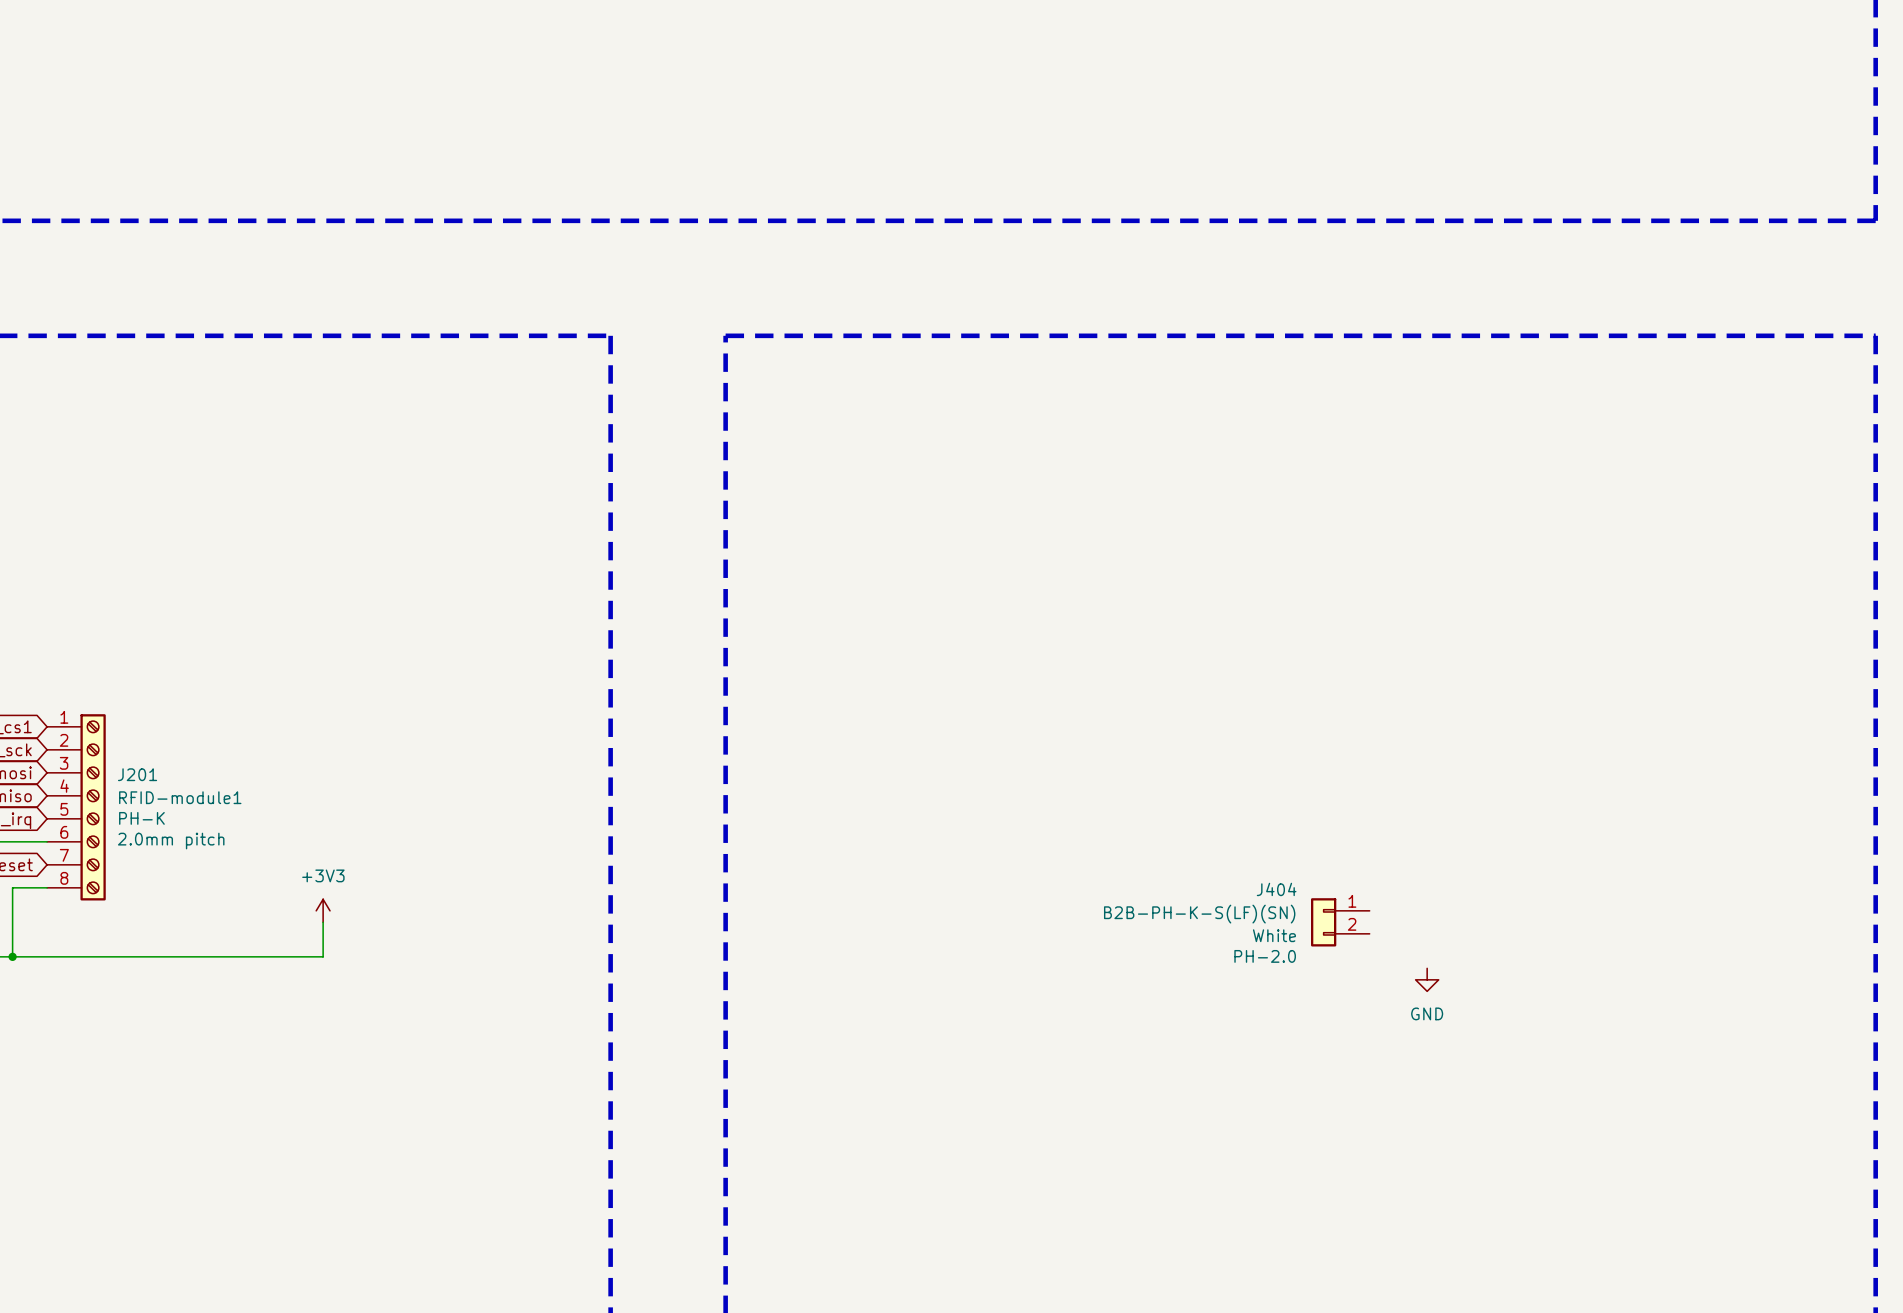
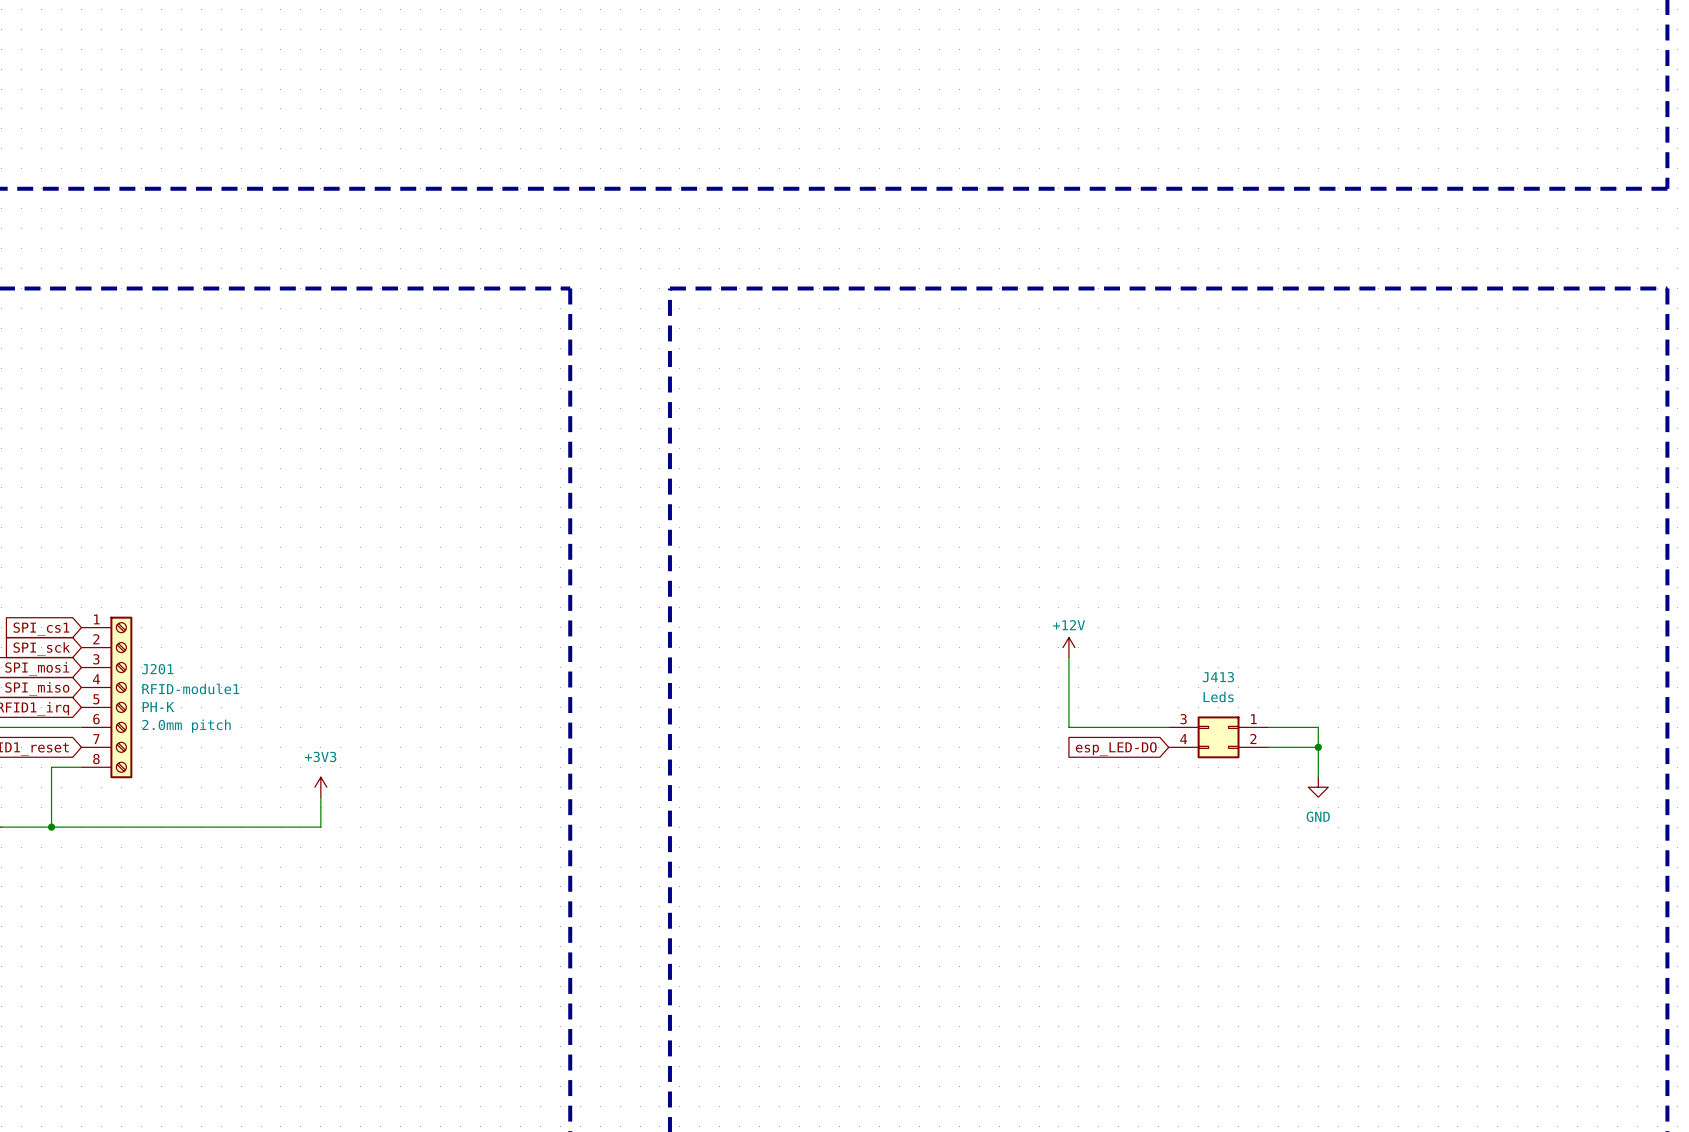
power symbol: none -> +12V (1068, 647)
wire: none -> (1068, 657) (1068, 727) (1168, 727)
wire: none -> (1268, 727) (1318, 727) (1318, 777)
J413: none -> Leds (1218, 737)
wire: none -> (1268, 747) (1318, 747)
junction: none -> (1318, 747)
global label: none -> esp_LED-DO (1116, 748)
J404: B2B-PH-K-S(LF)(SN) (1340, 922) -> none
power symbol position: GND (1427, 979) -> GND (1318, 787)

